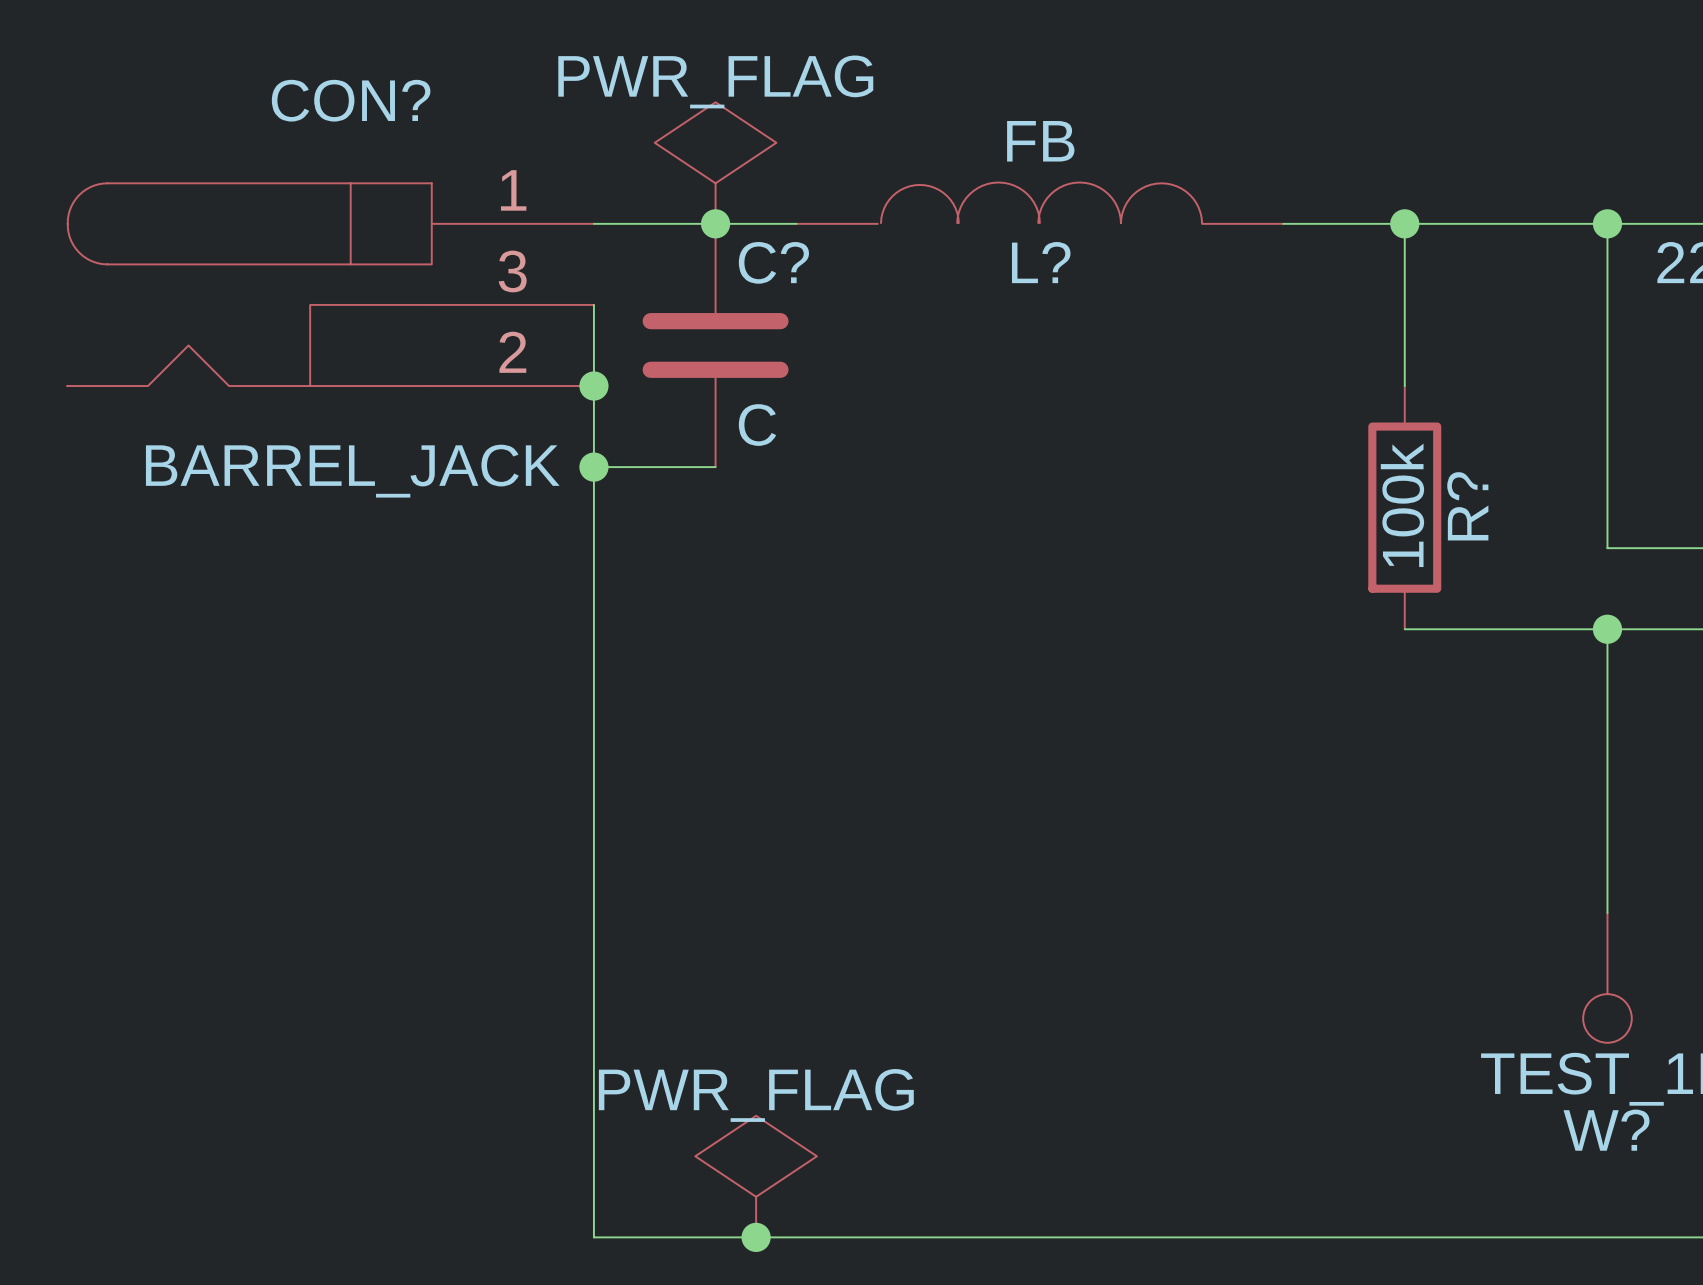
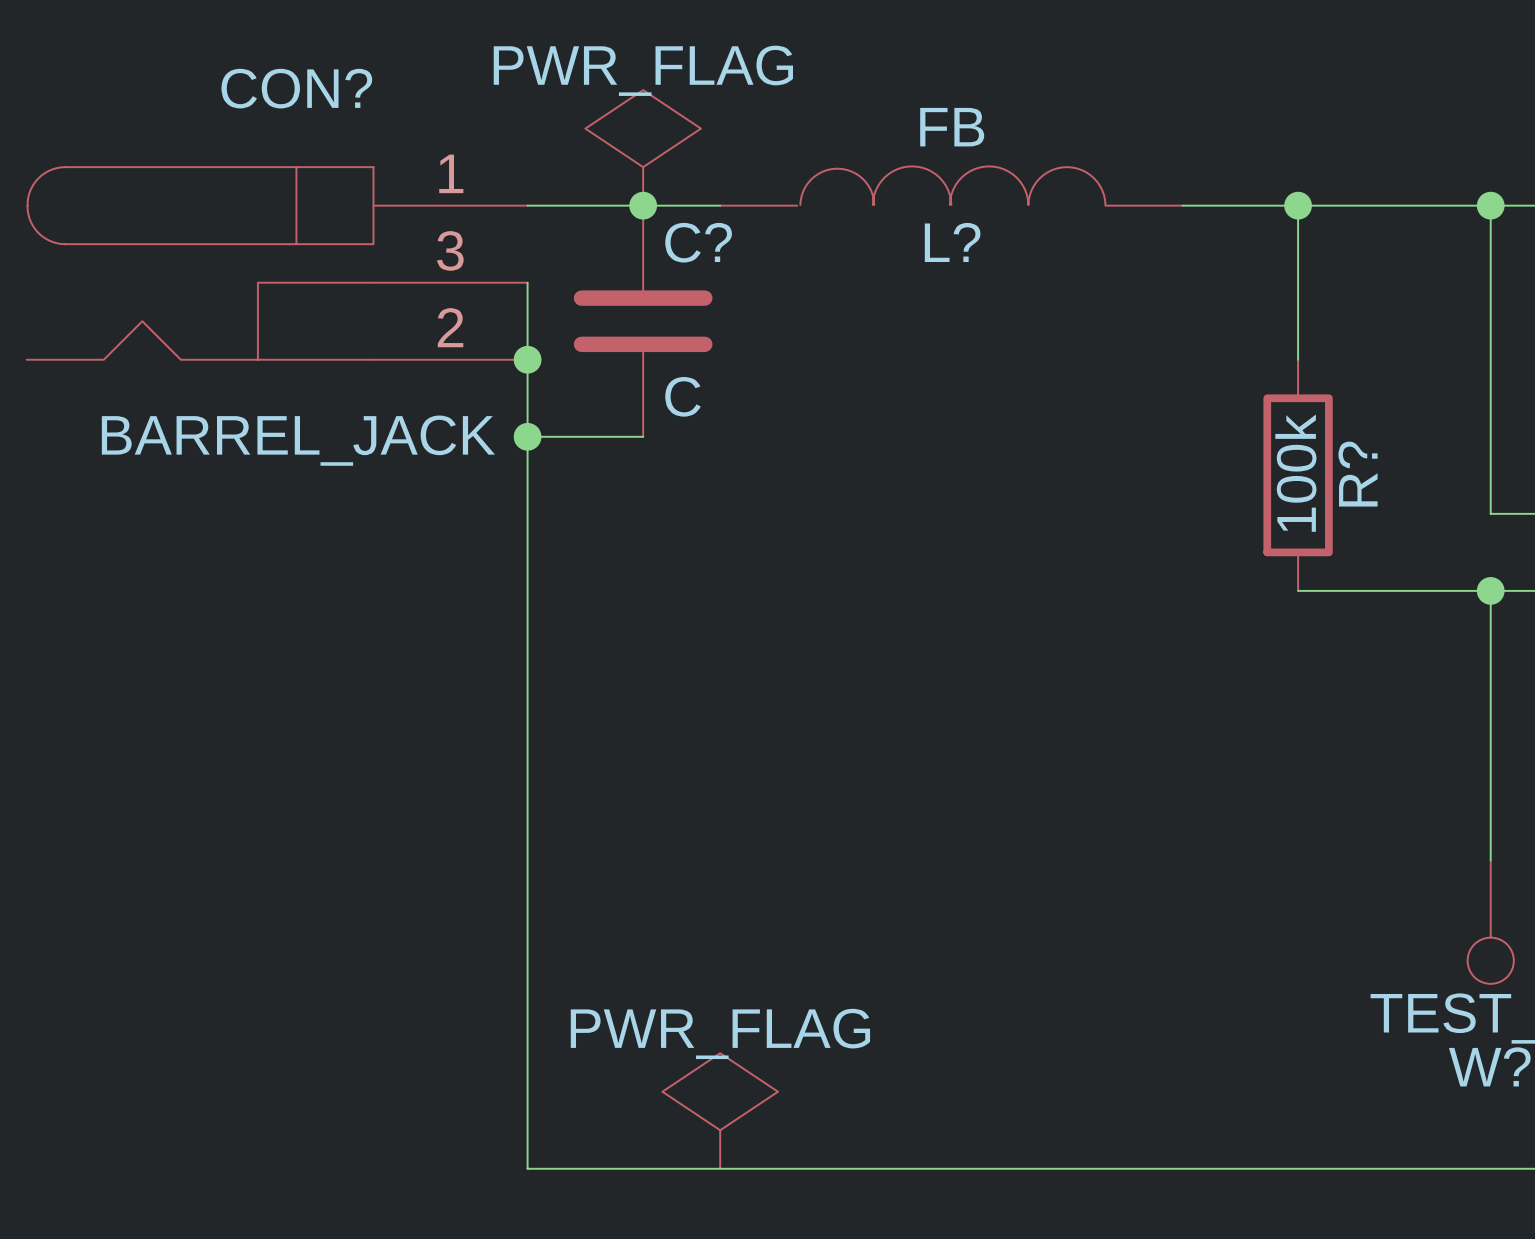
power symbol position: PWR_FLAG (756, 1176) -> PWR_FLAG (720, 1110)
junction: (756, 1237) -> none

